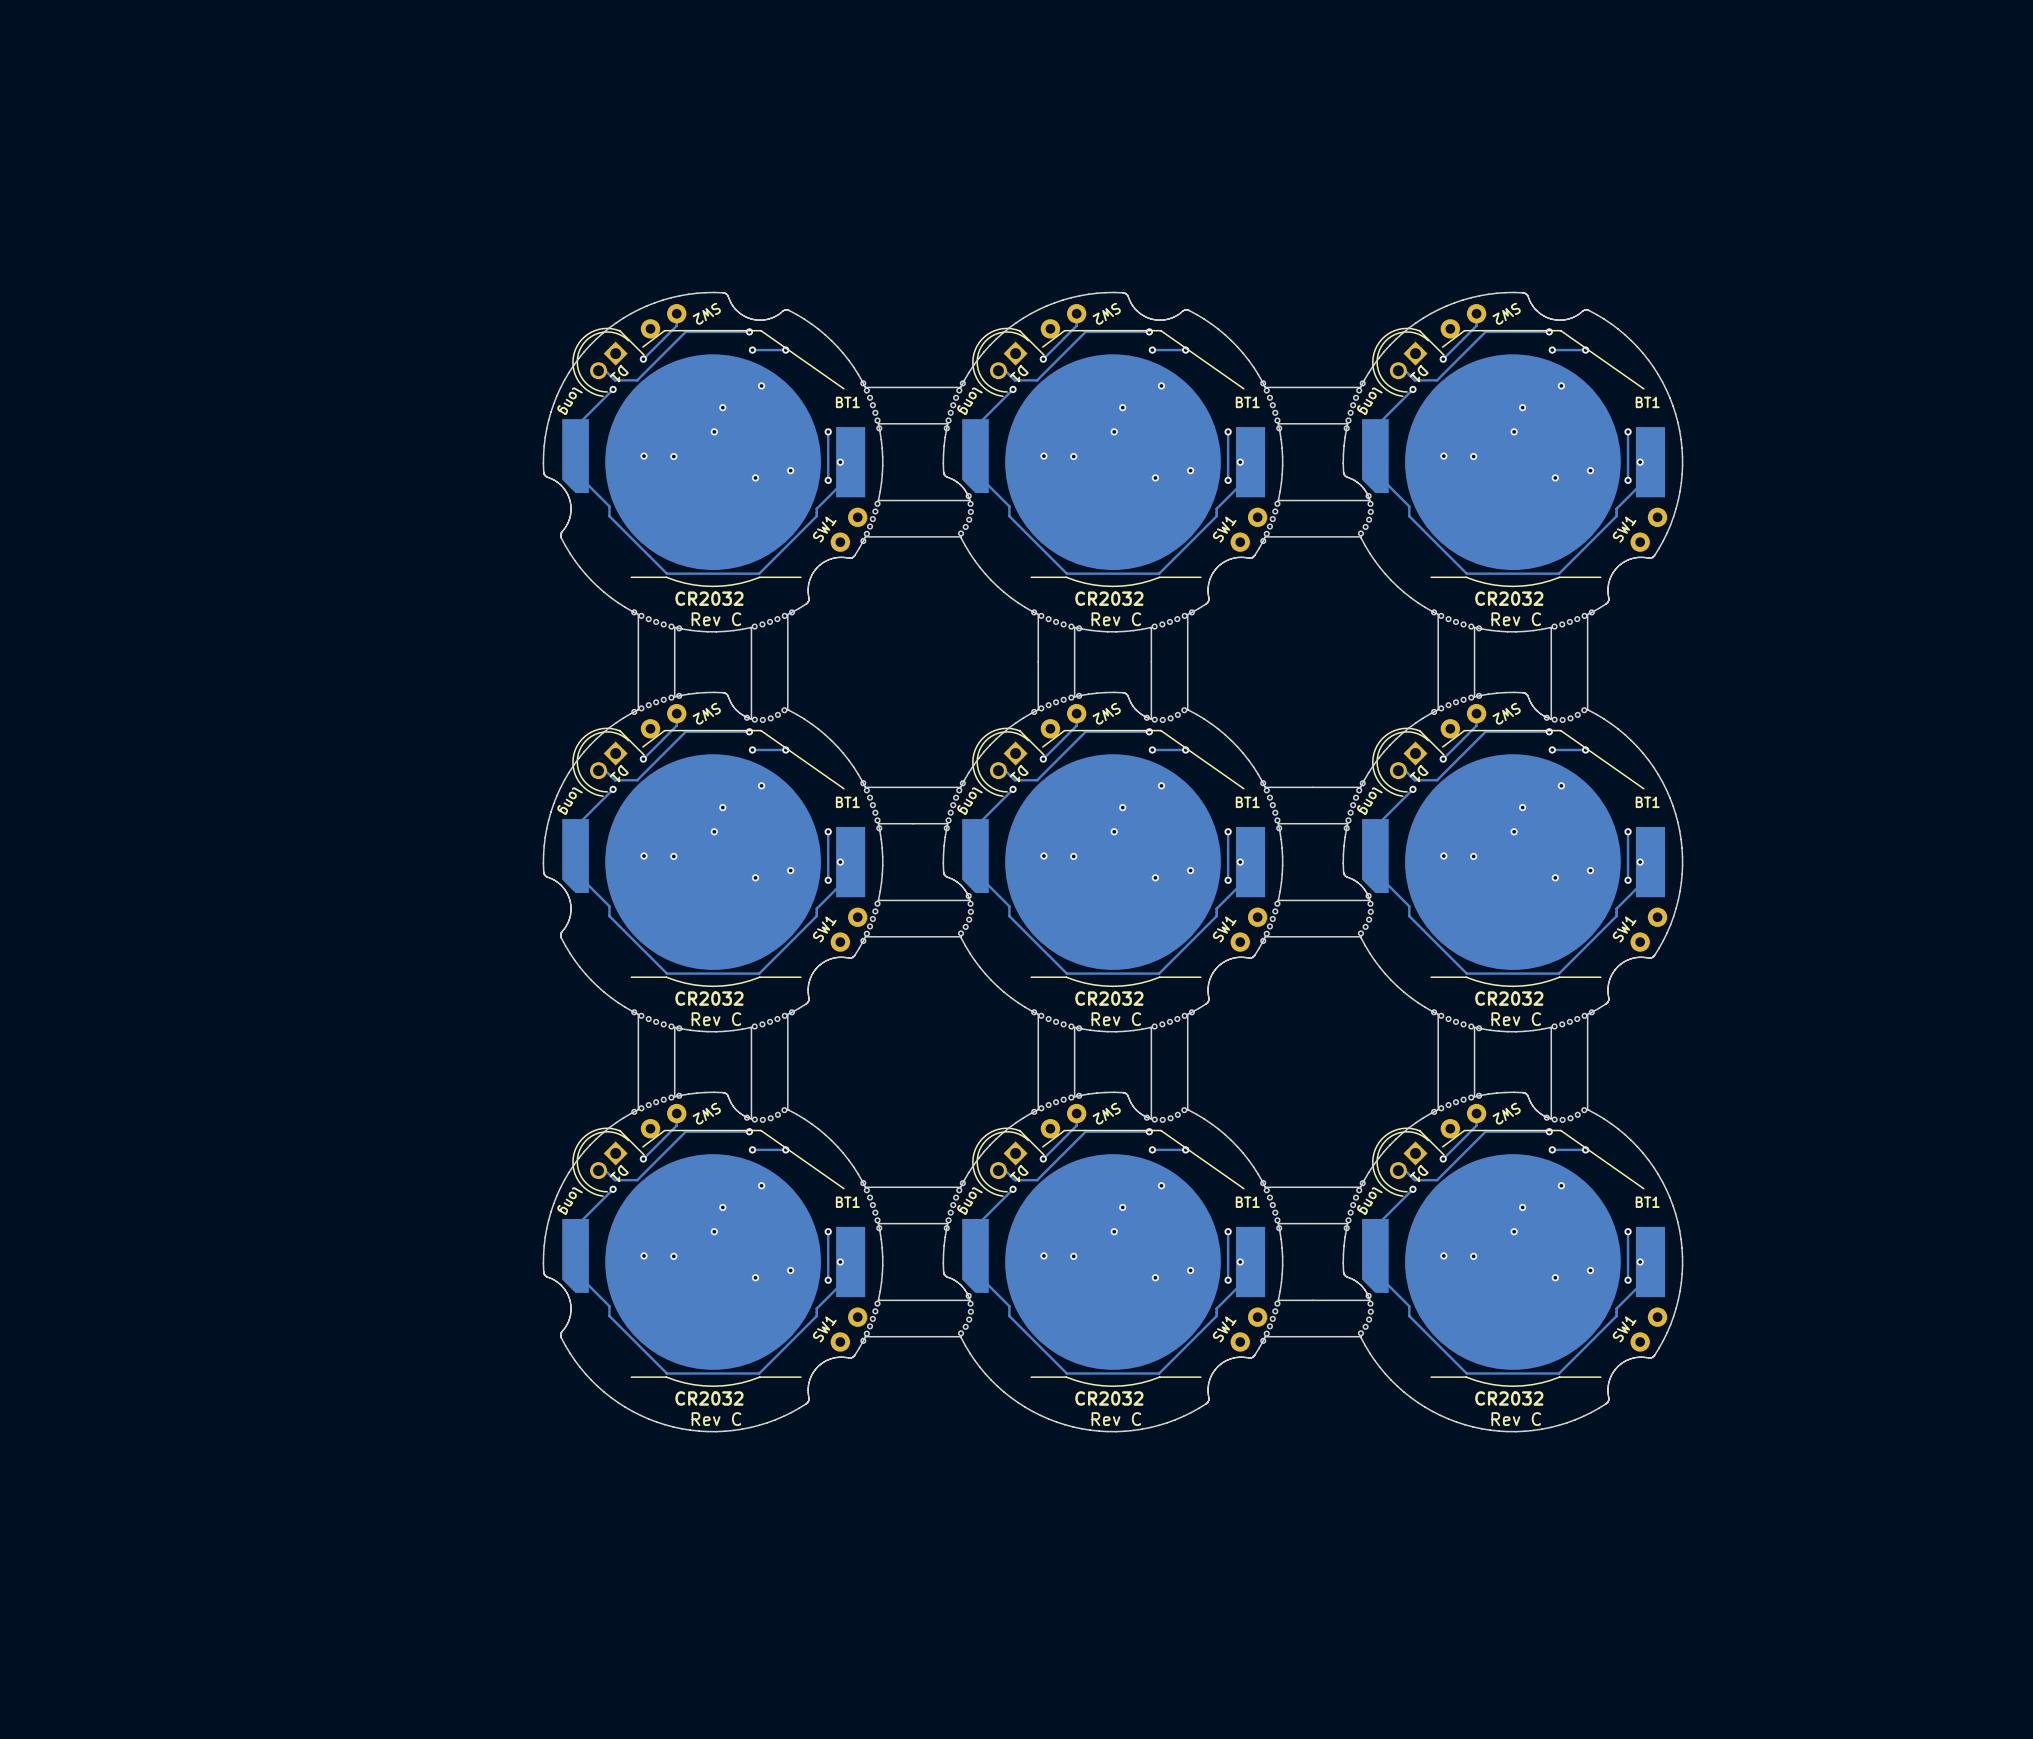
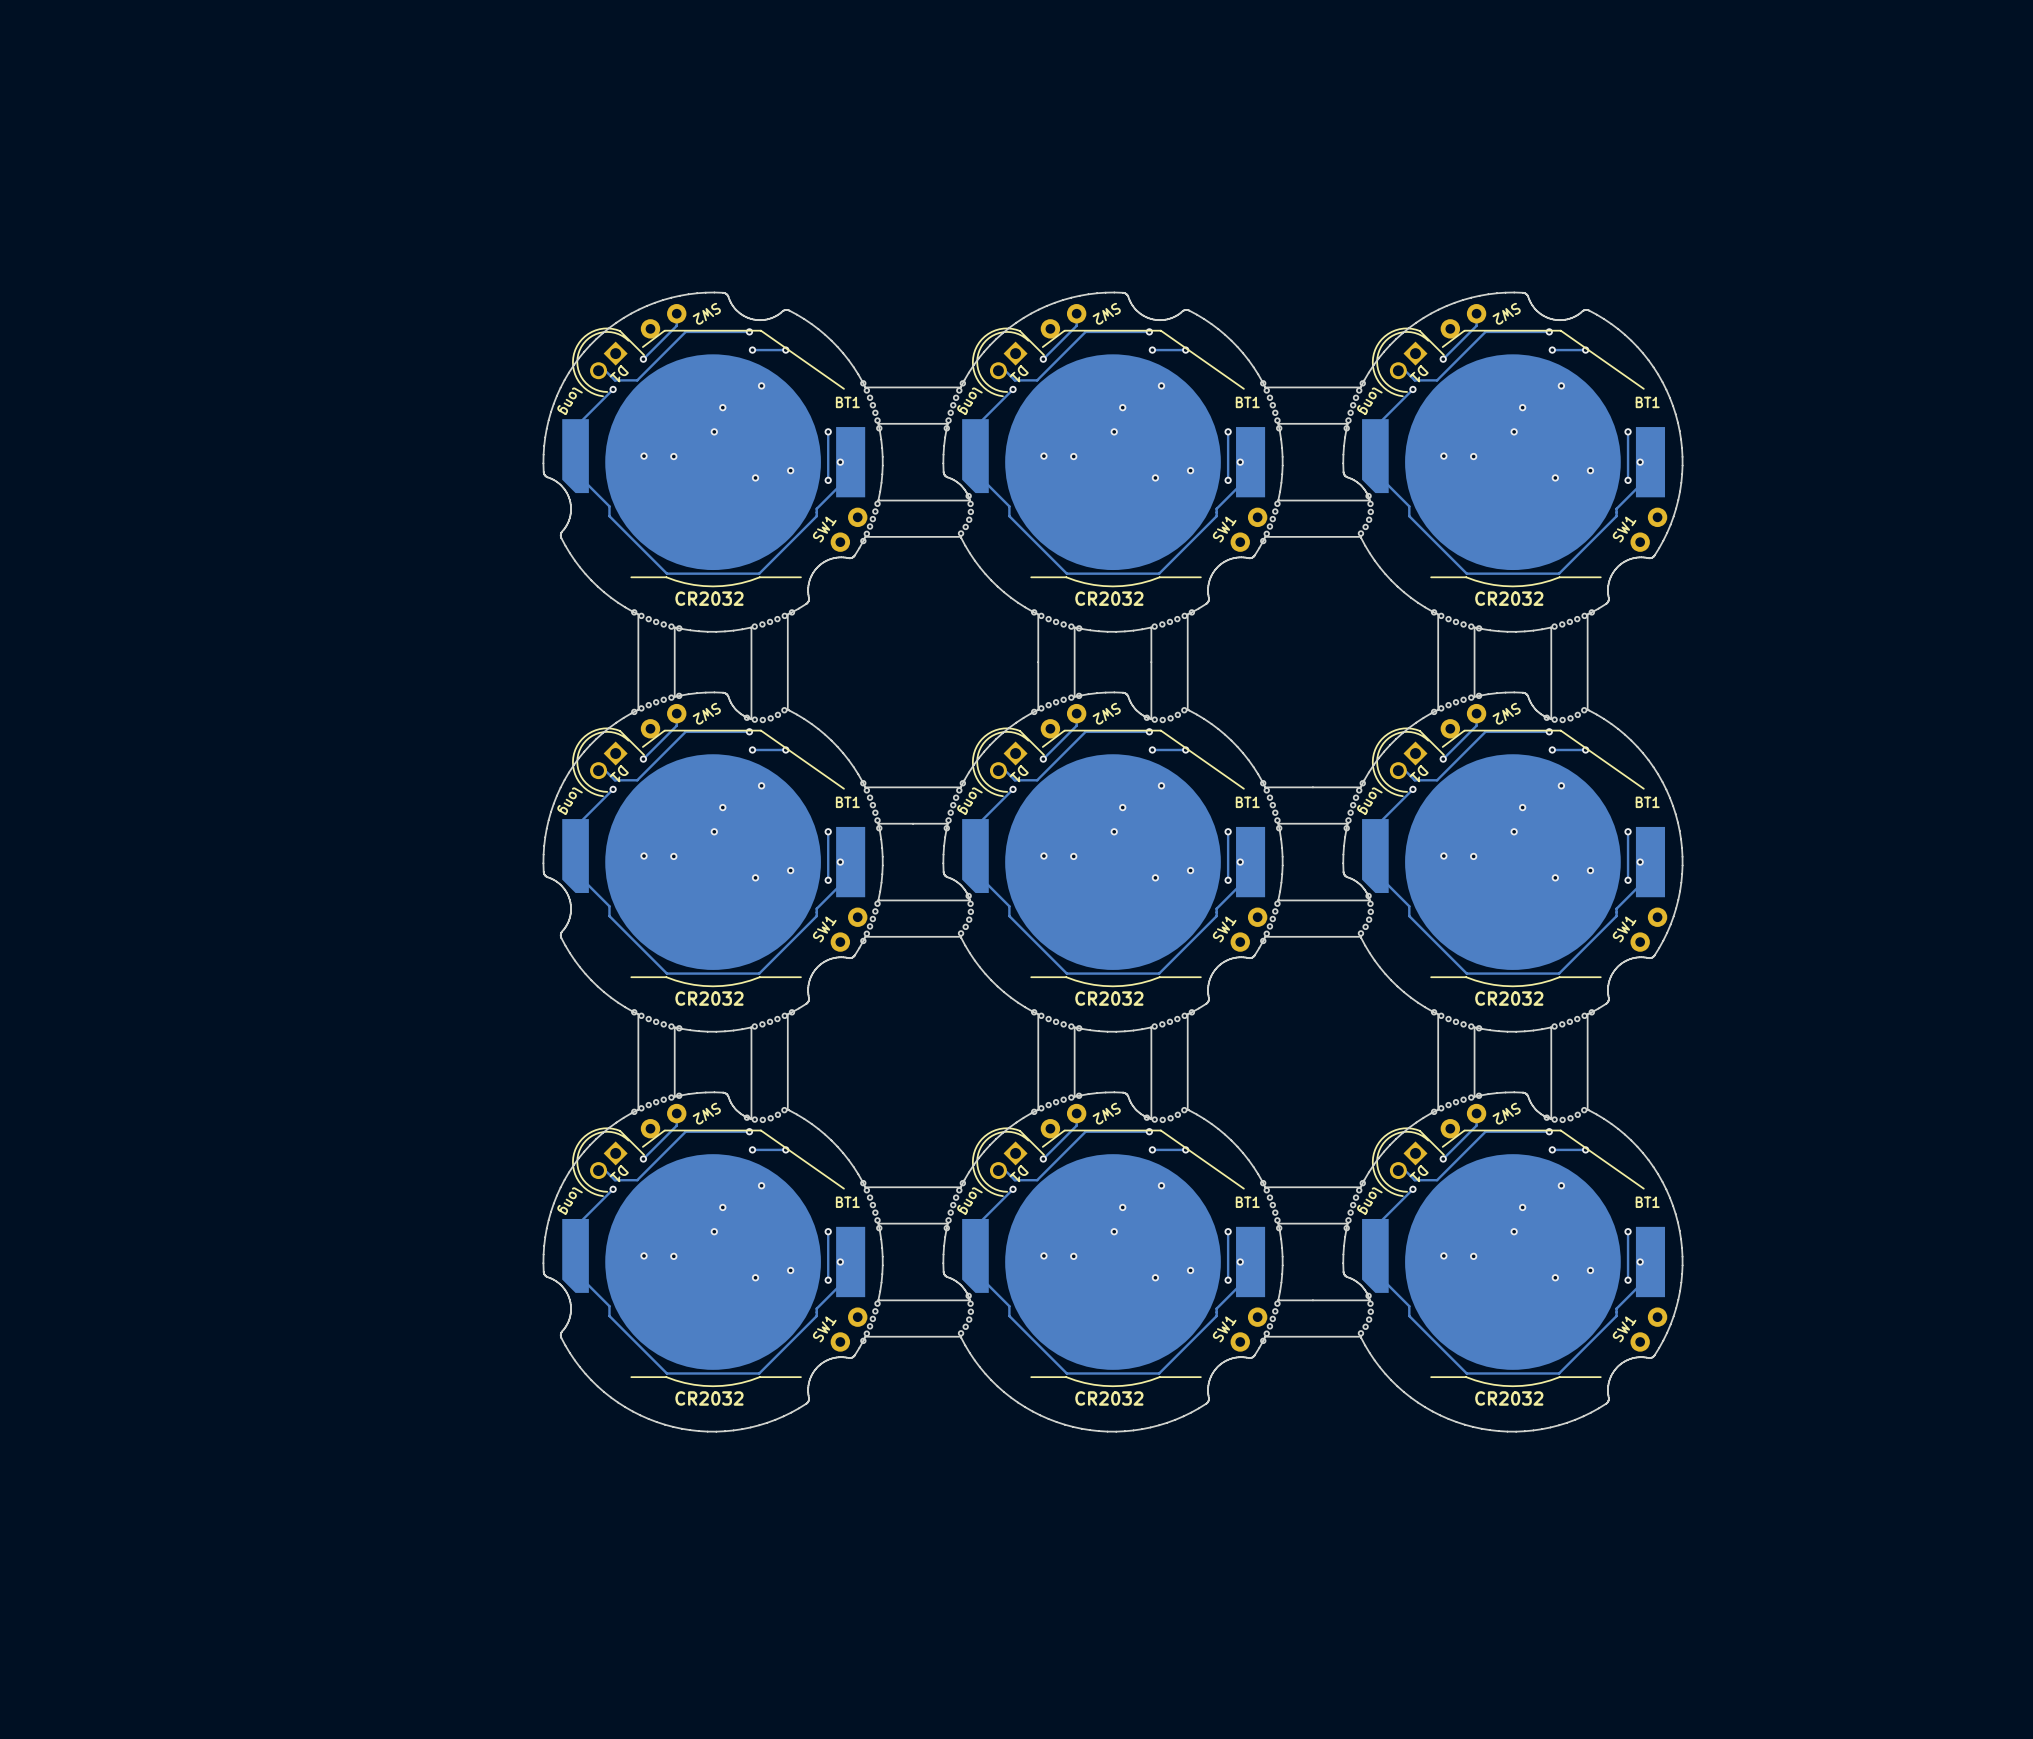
text: Rev C (716, 619) -> none
text: Rev C (1116, 619) -> none
text: Rev C (1516, 619) -> none
text: Rev C (716, 1019) -> none
text: Rev C (1116, 1019) -> none
text: Rev C (1516, 1019) -> none
text: Rev C (716, 1419) -> none
text: Rev C (1116, 1419) -> none
text: Rev C (1516, 1419) -> none

